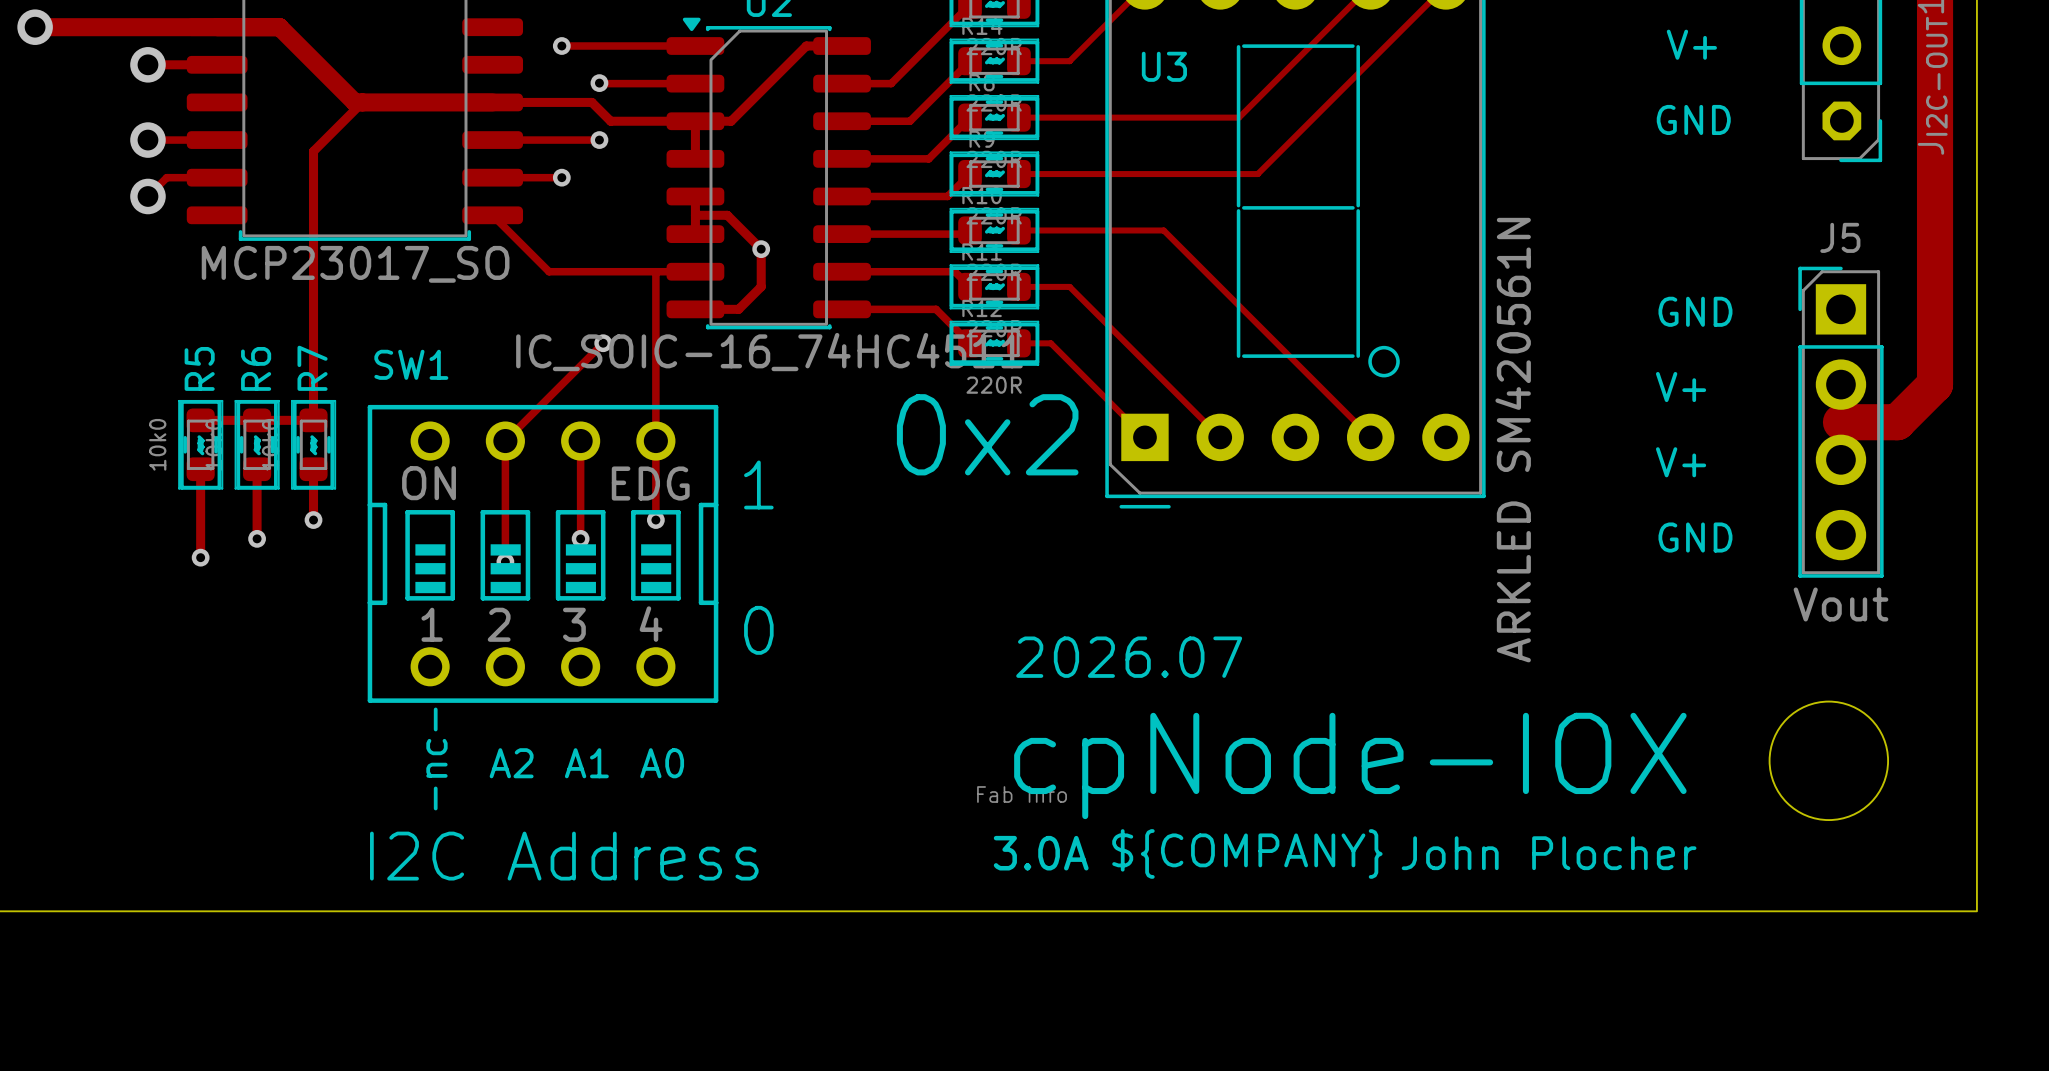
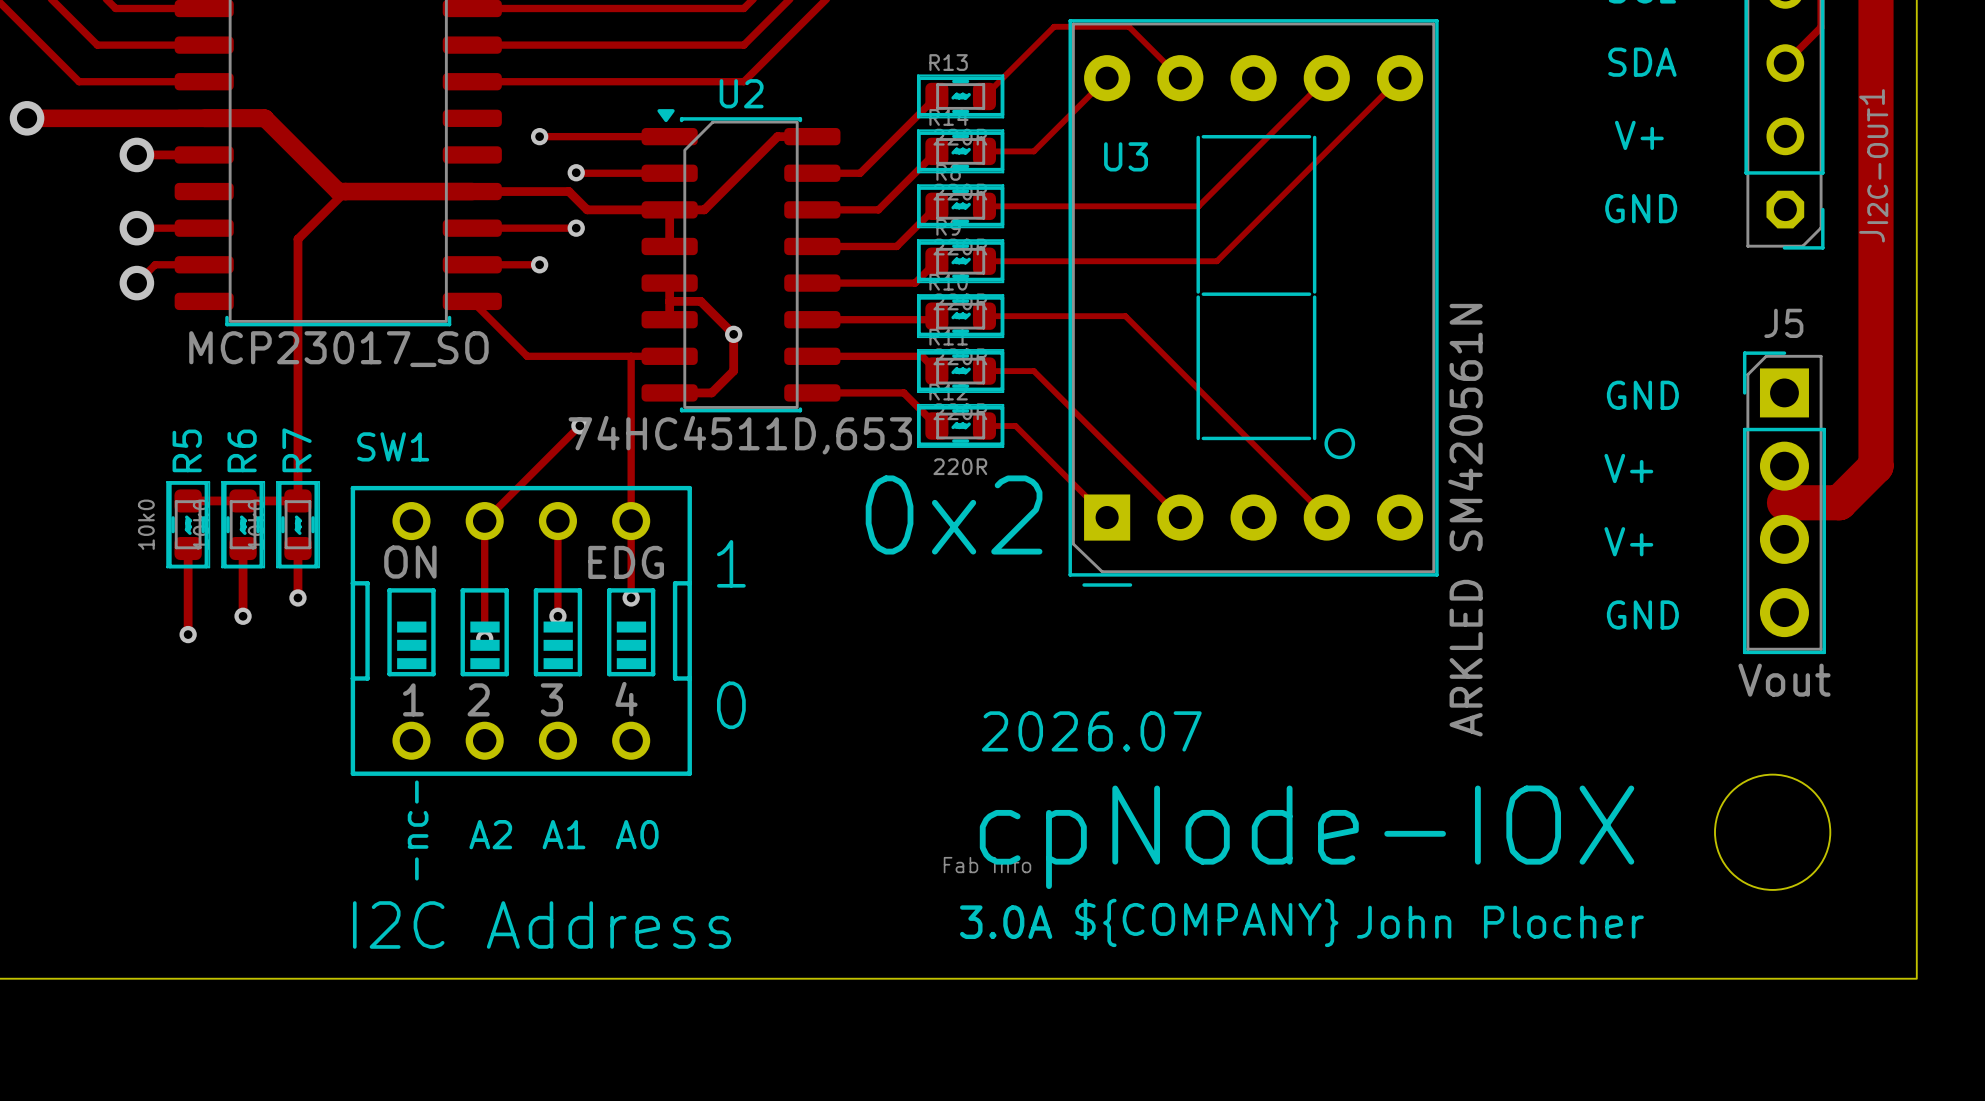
U2 value: IC_SOIC-16_74HC4511 (769, 352) -> 74HC4511D,653 (740, 435)

